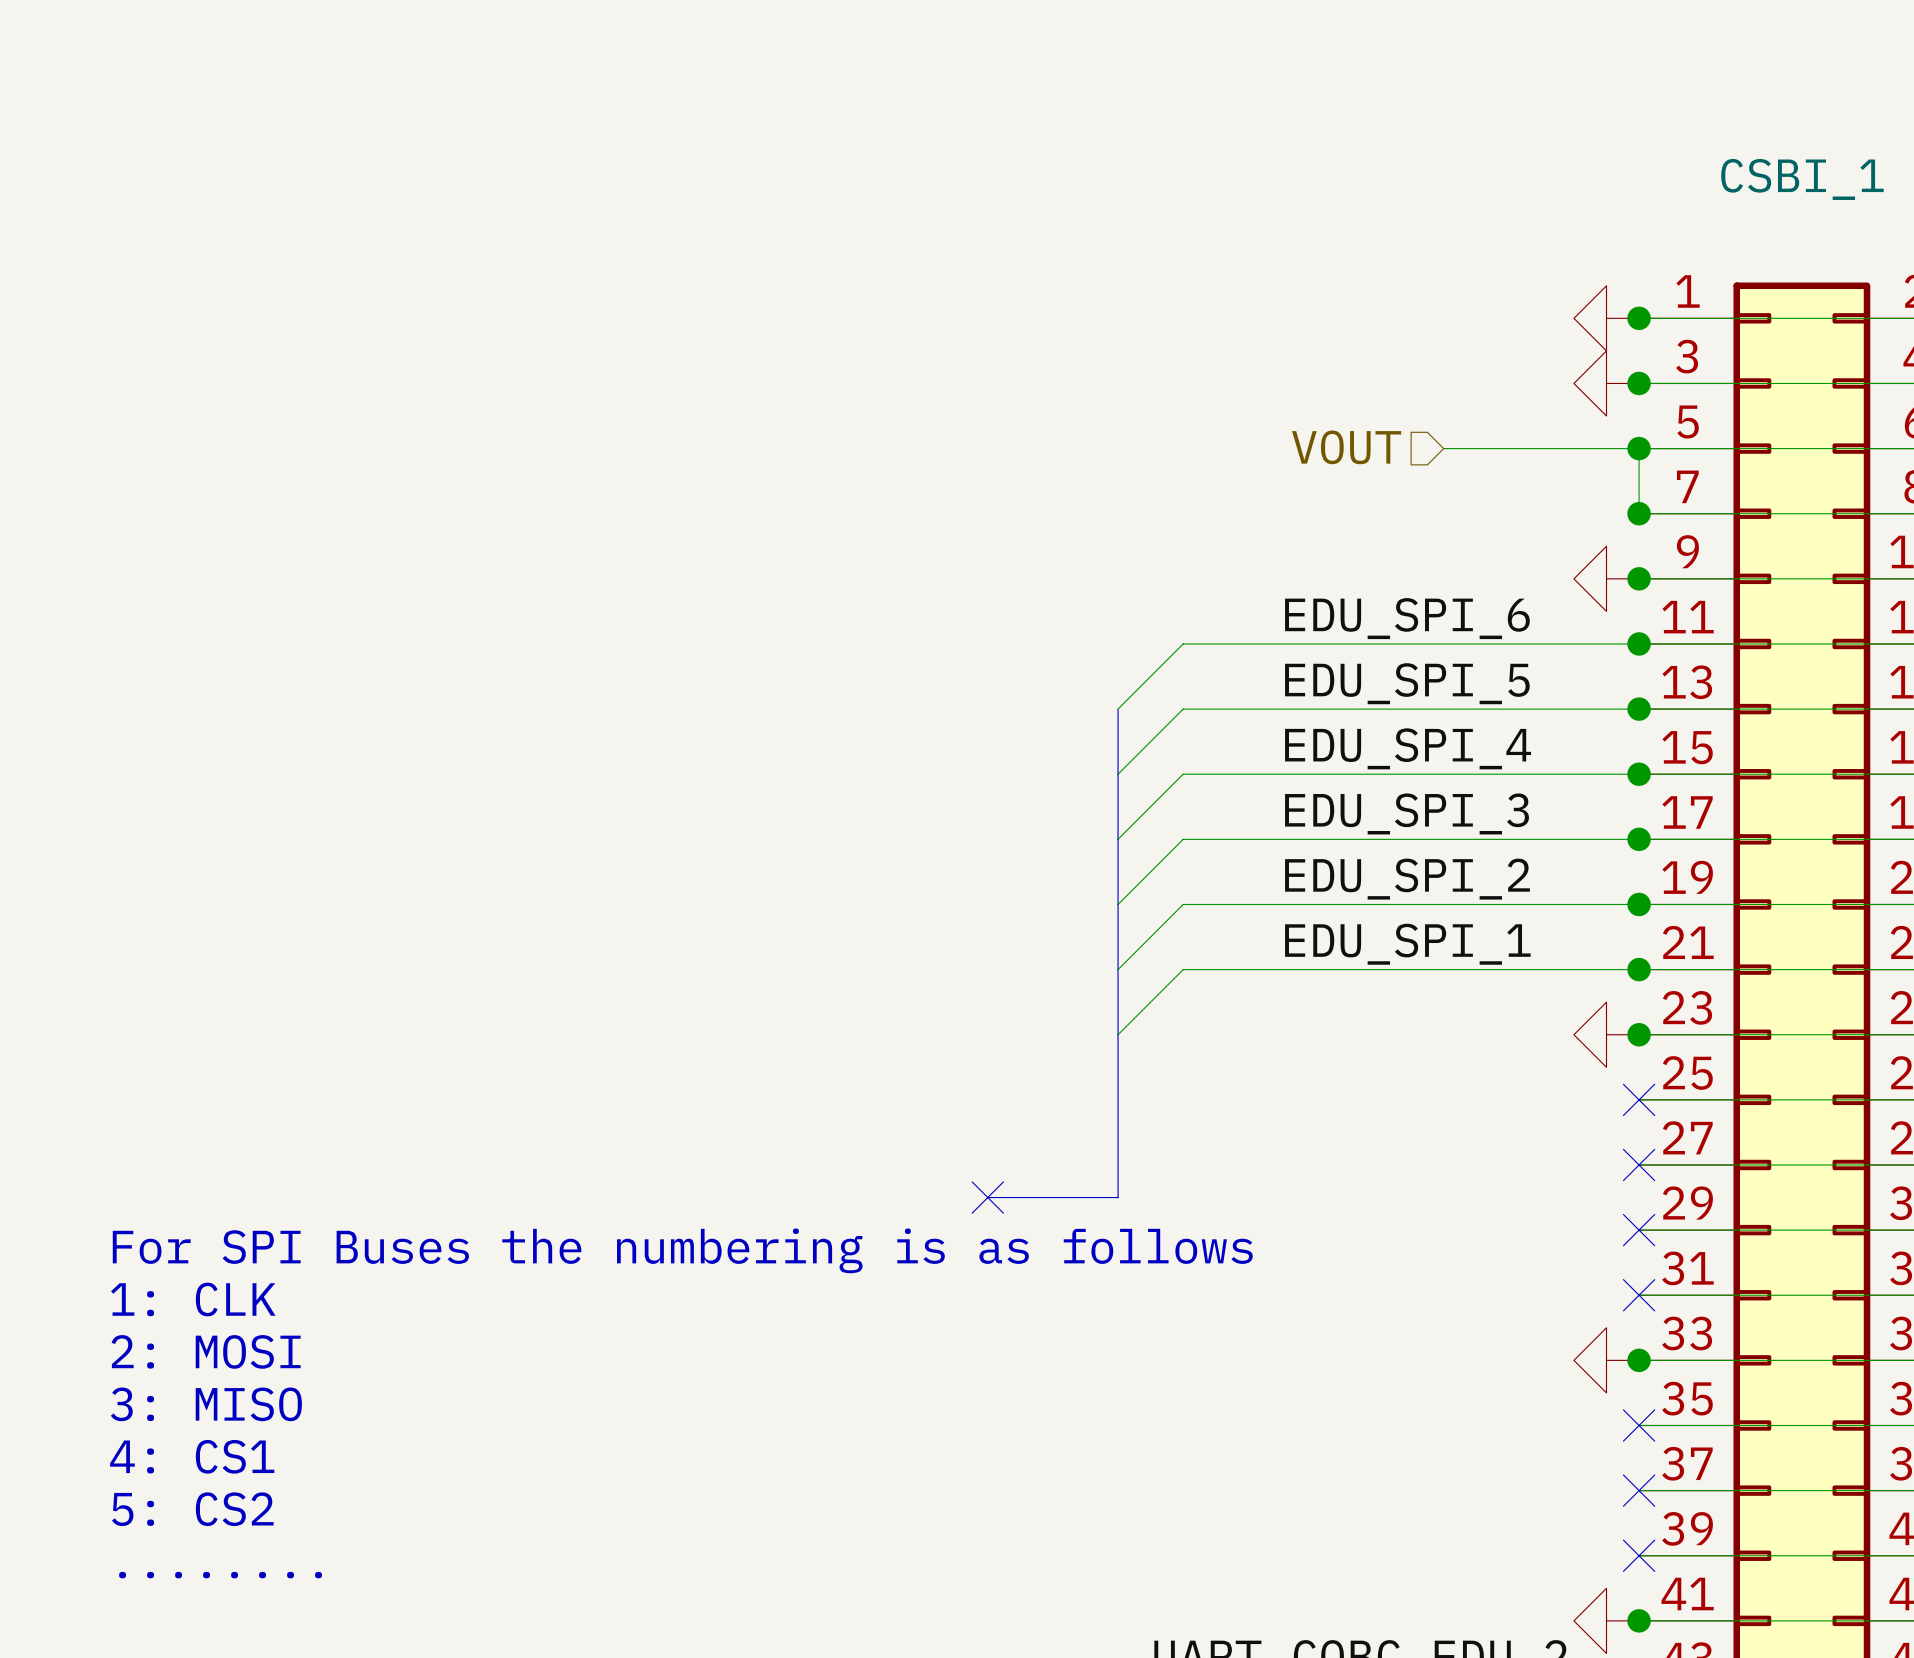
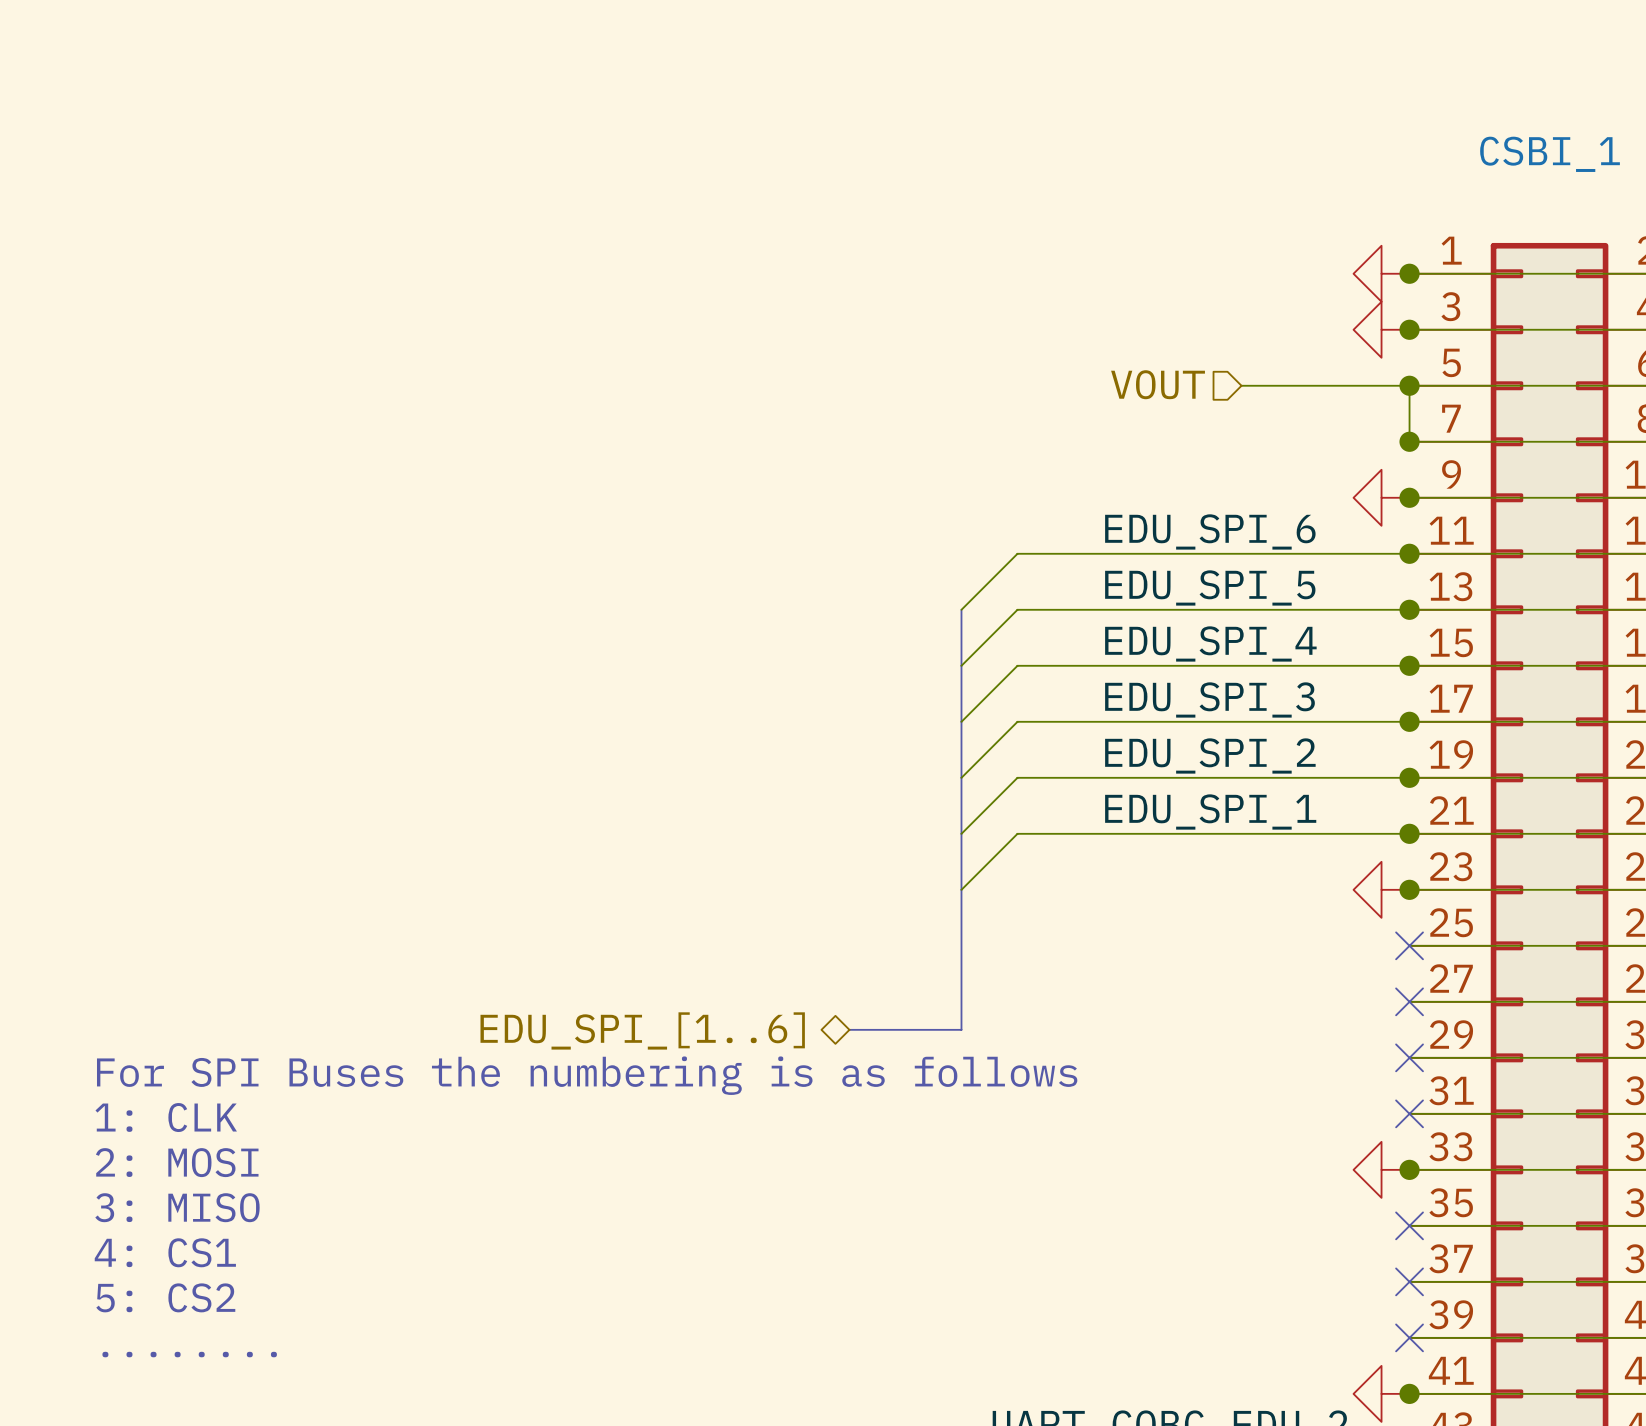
no-connect mark: (987, 1197) -> none
hierarchical label: none -> EDU_SPI_[1..6] (642, 1030)

